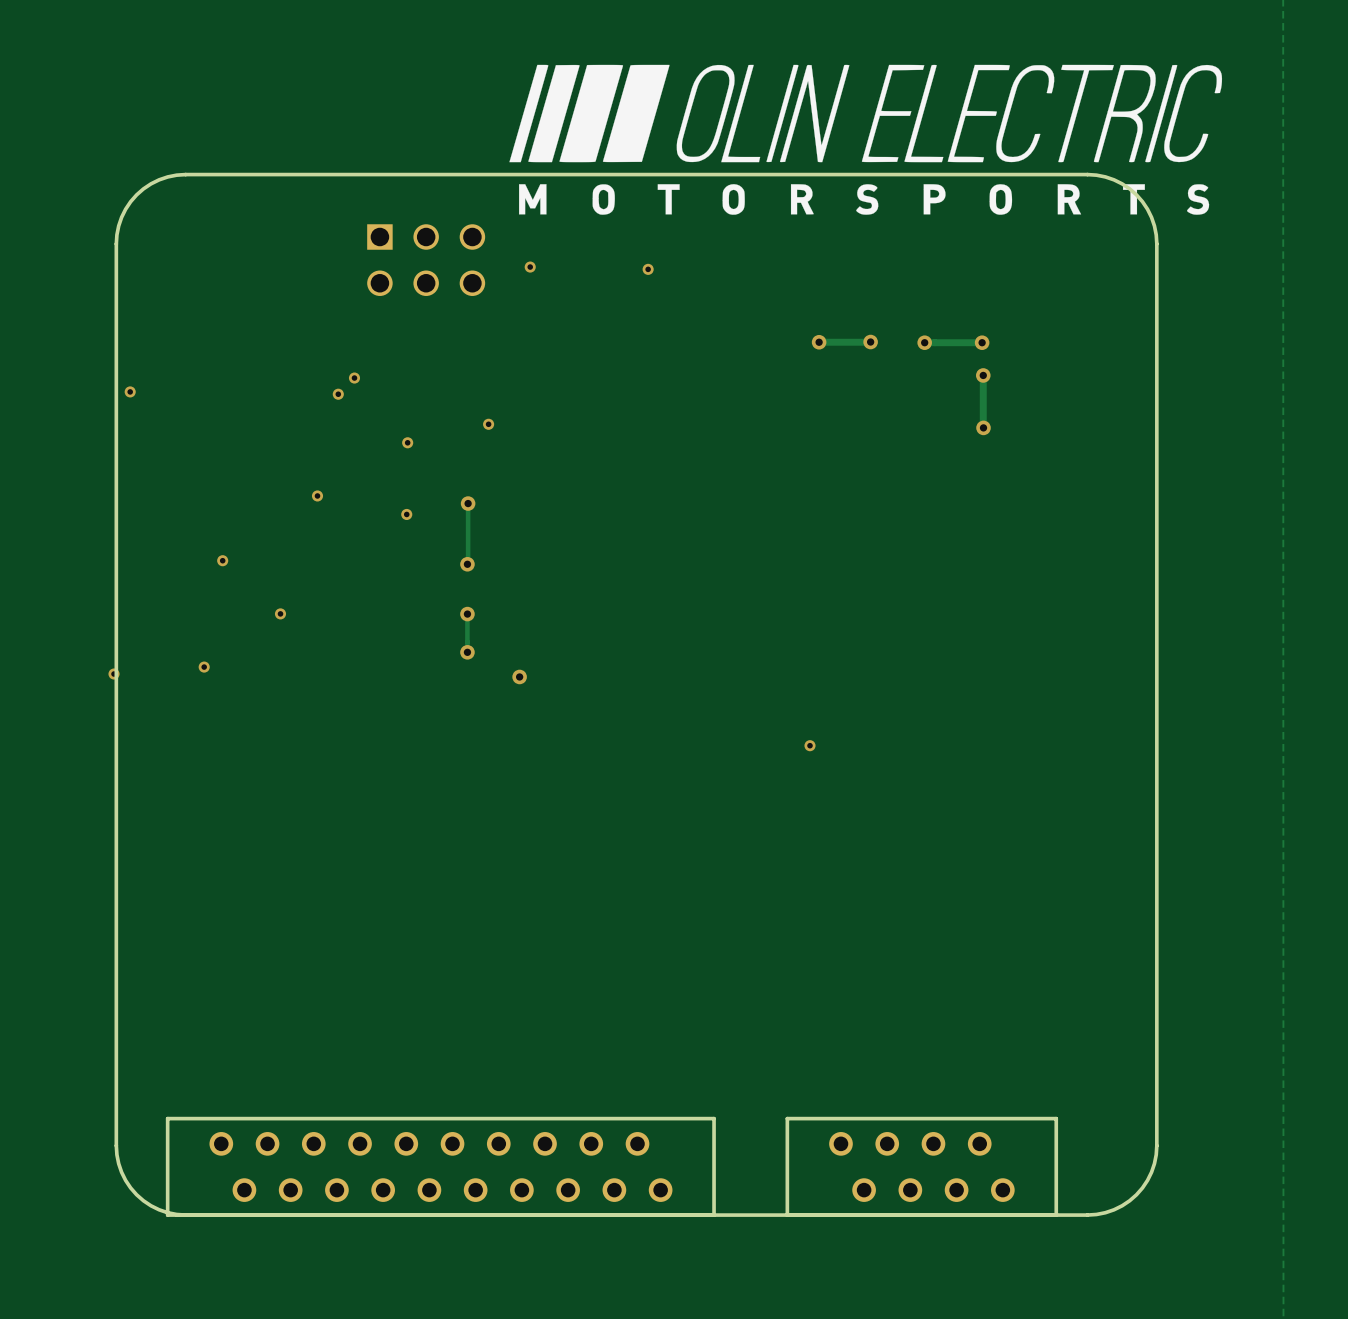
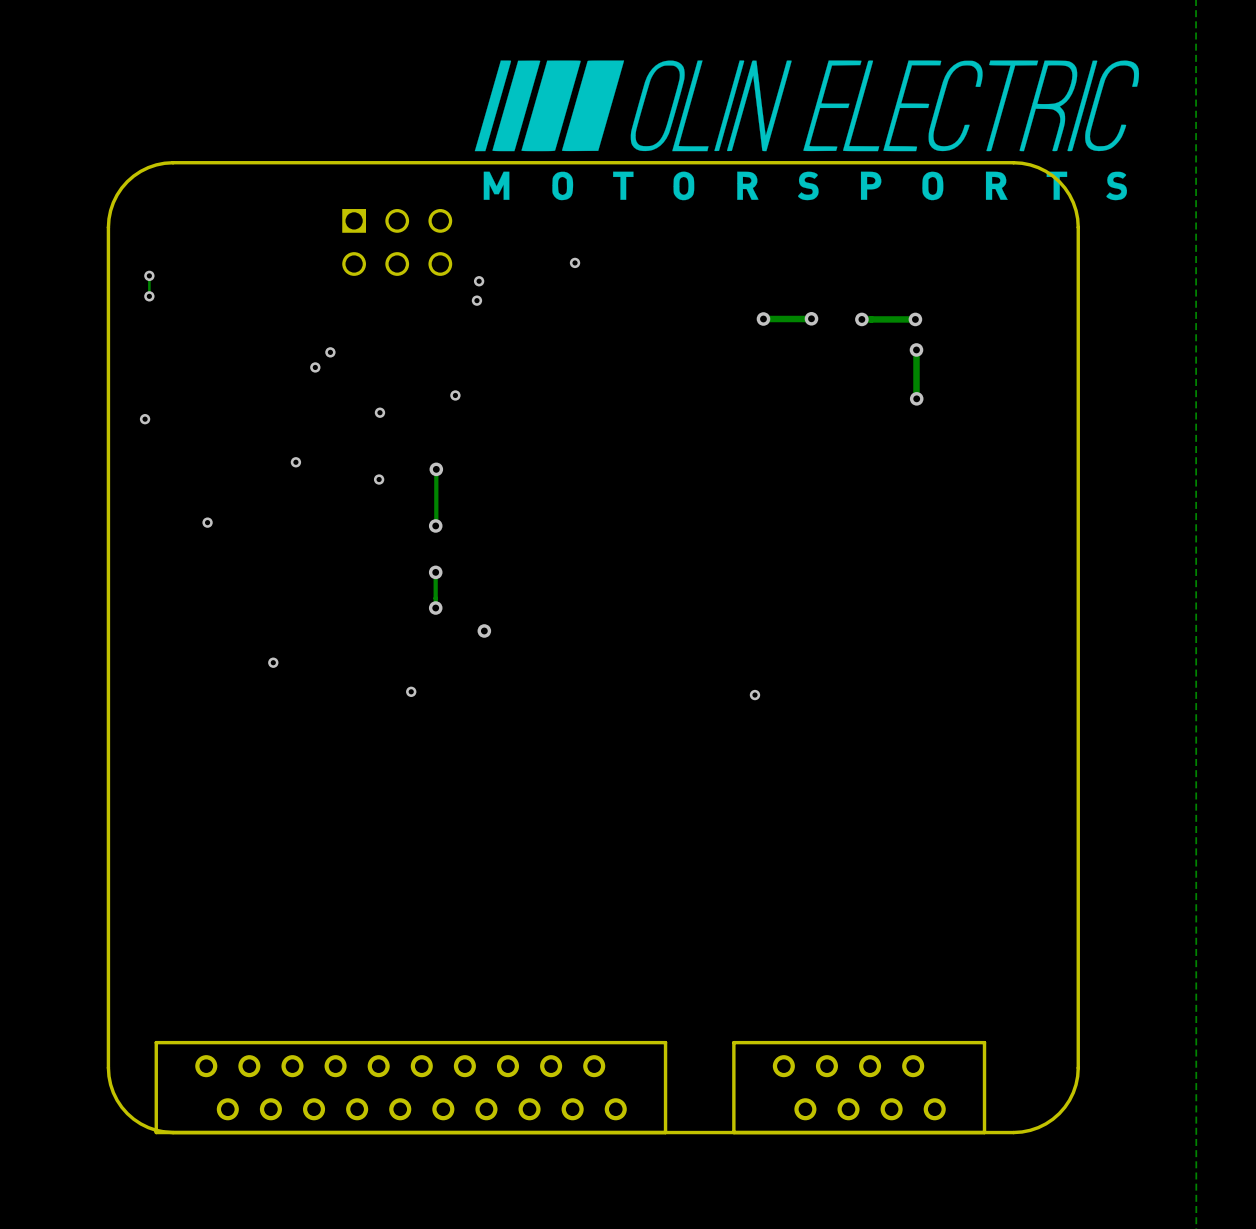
via: (530, 267) -> none
via position: (648, 269) -> (575, 262)
track: none -> (149, 275) (149, 296)
via: none -> (149, 275)
via: none -> (479, 281)
via: none -> (149, 296)
via: none -> (476, 300)
via: (130, 391) -> none
via: none -> (145, 419)
via: (280, 613) -> none
via: (204, 667) -> none
via: (114, 674) -> none
via: none -> (273, 662)
via: none -> (411, 691)

